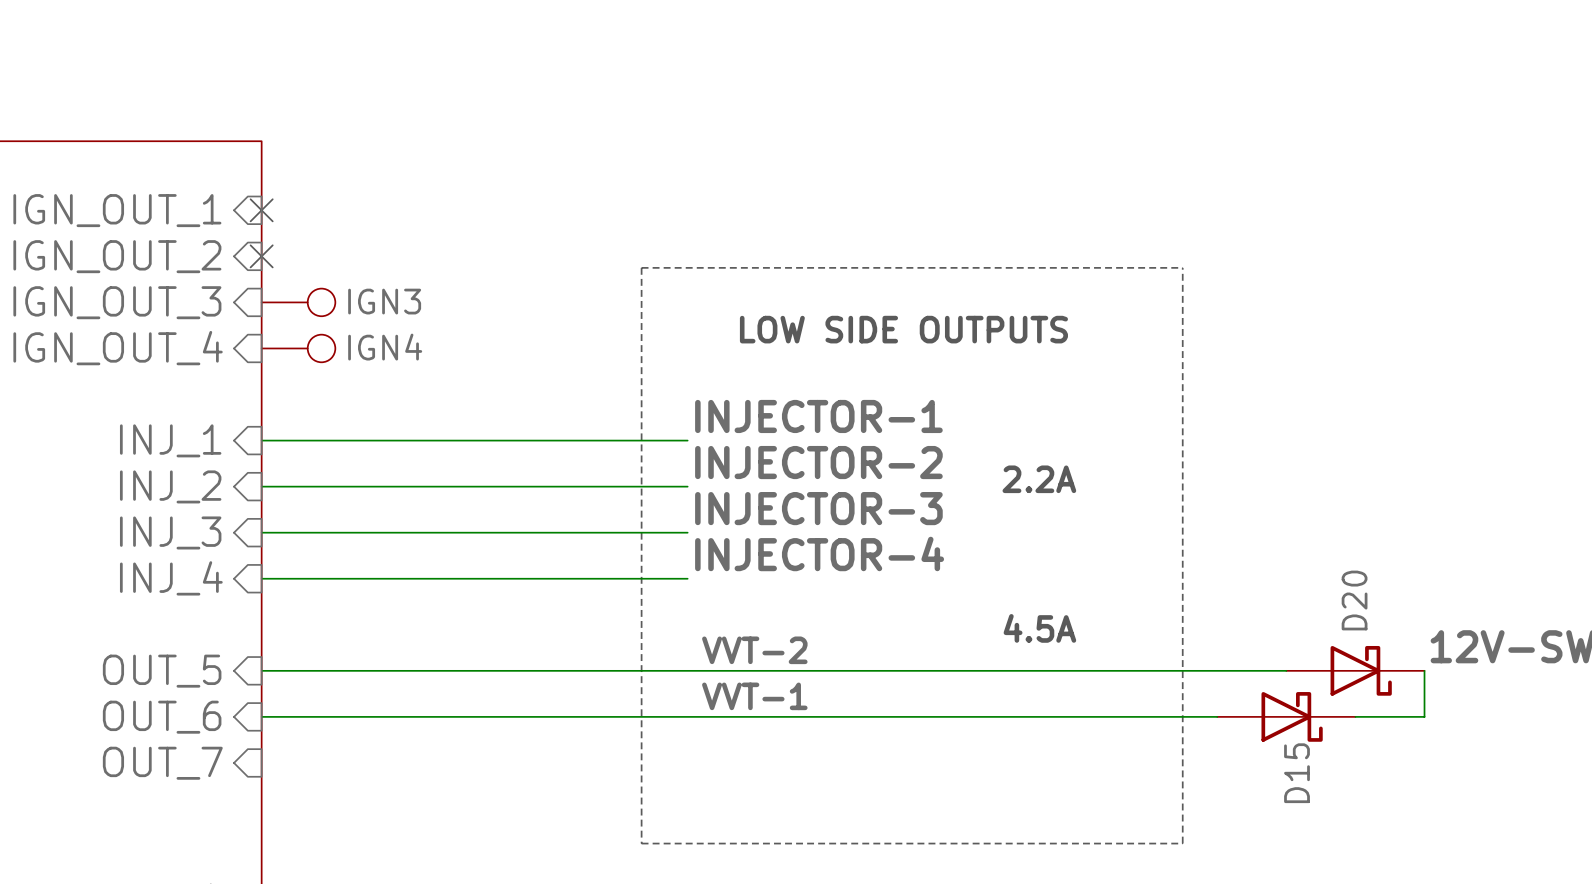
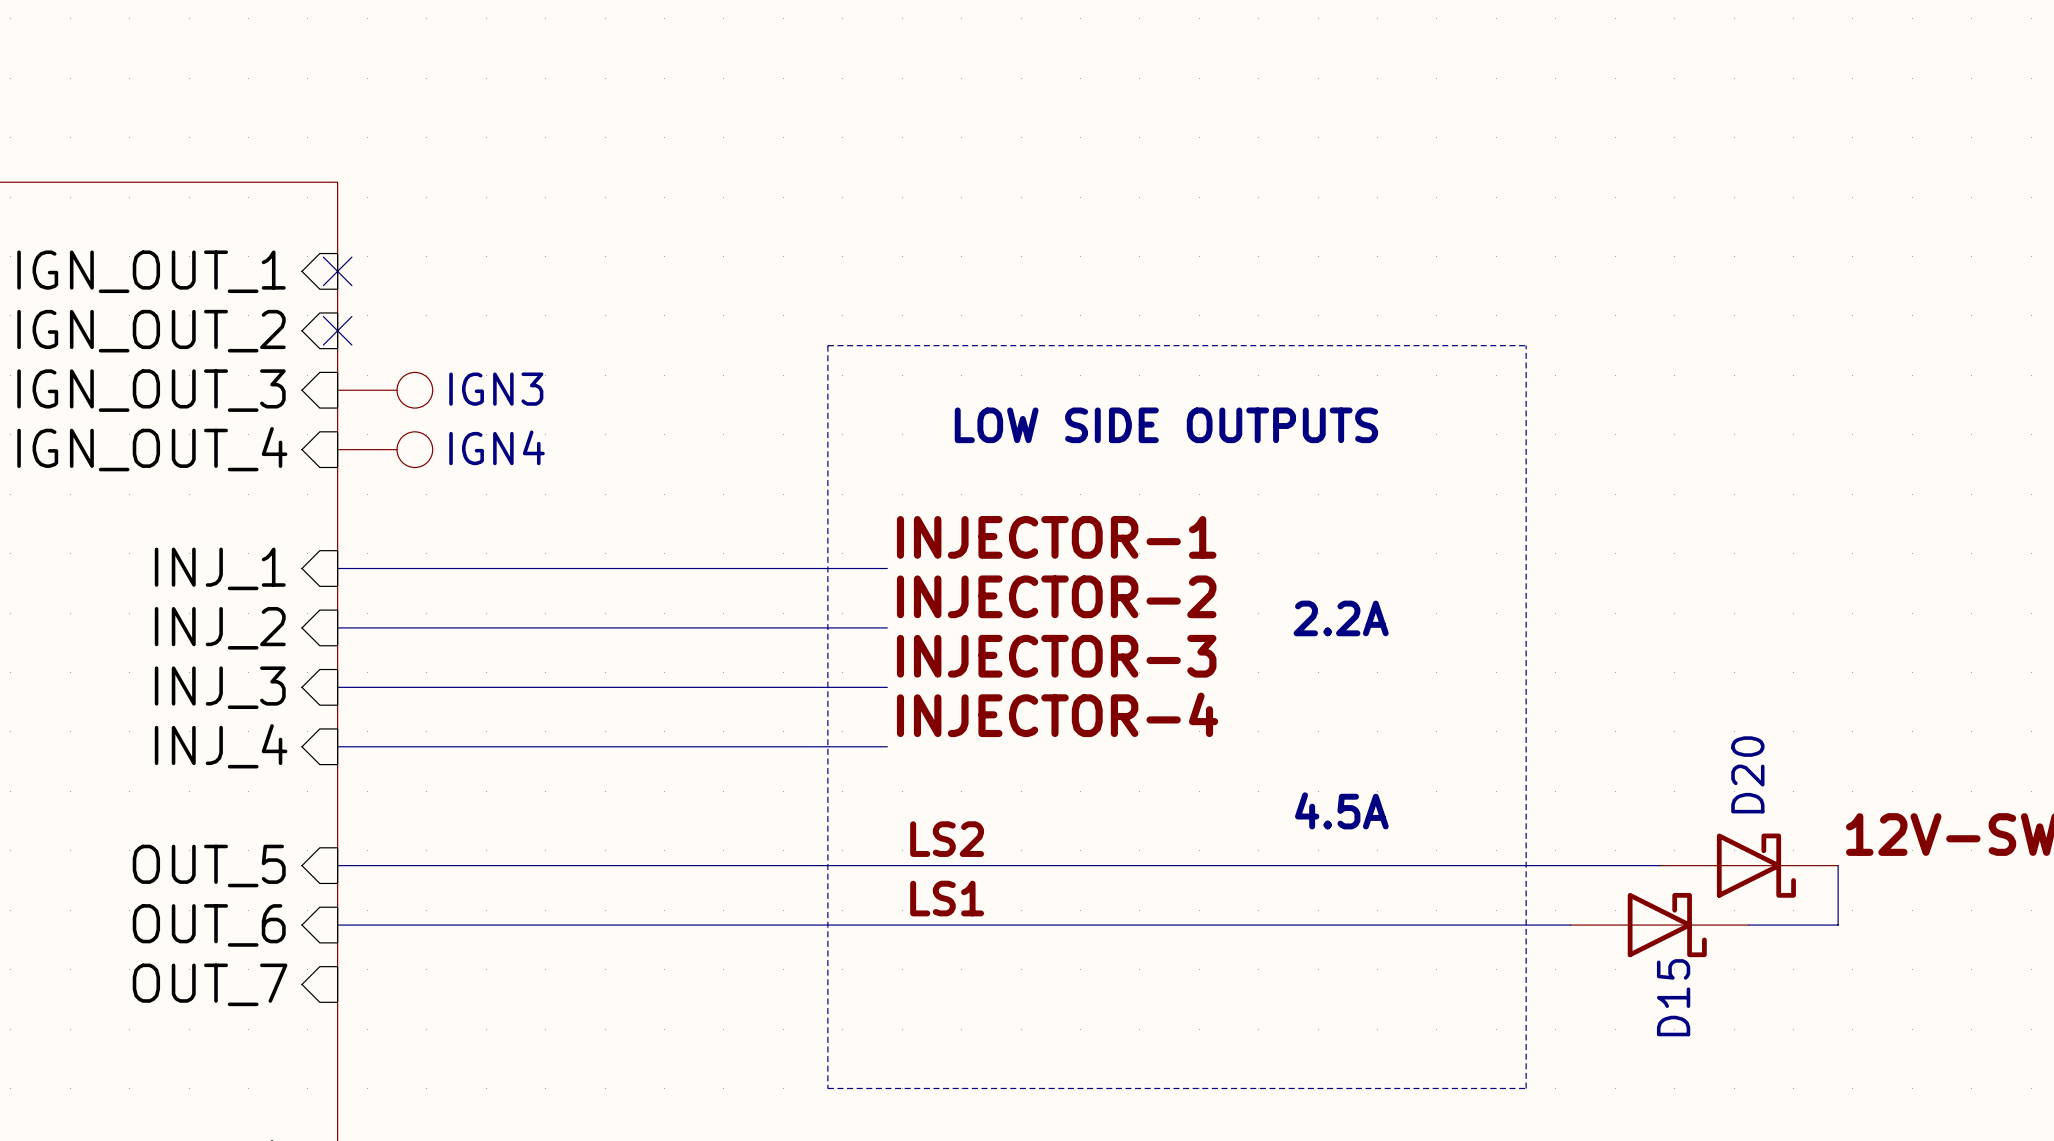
label: VVT-2 (754, 650) -> LS2 (947, 839)
label: VVT-1 (754, 696) -> LS1 (947, 898)

